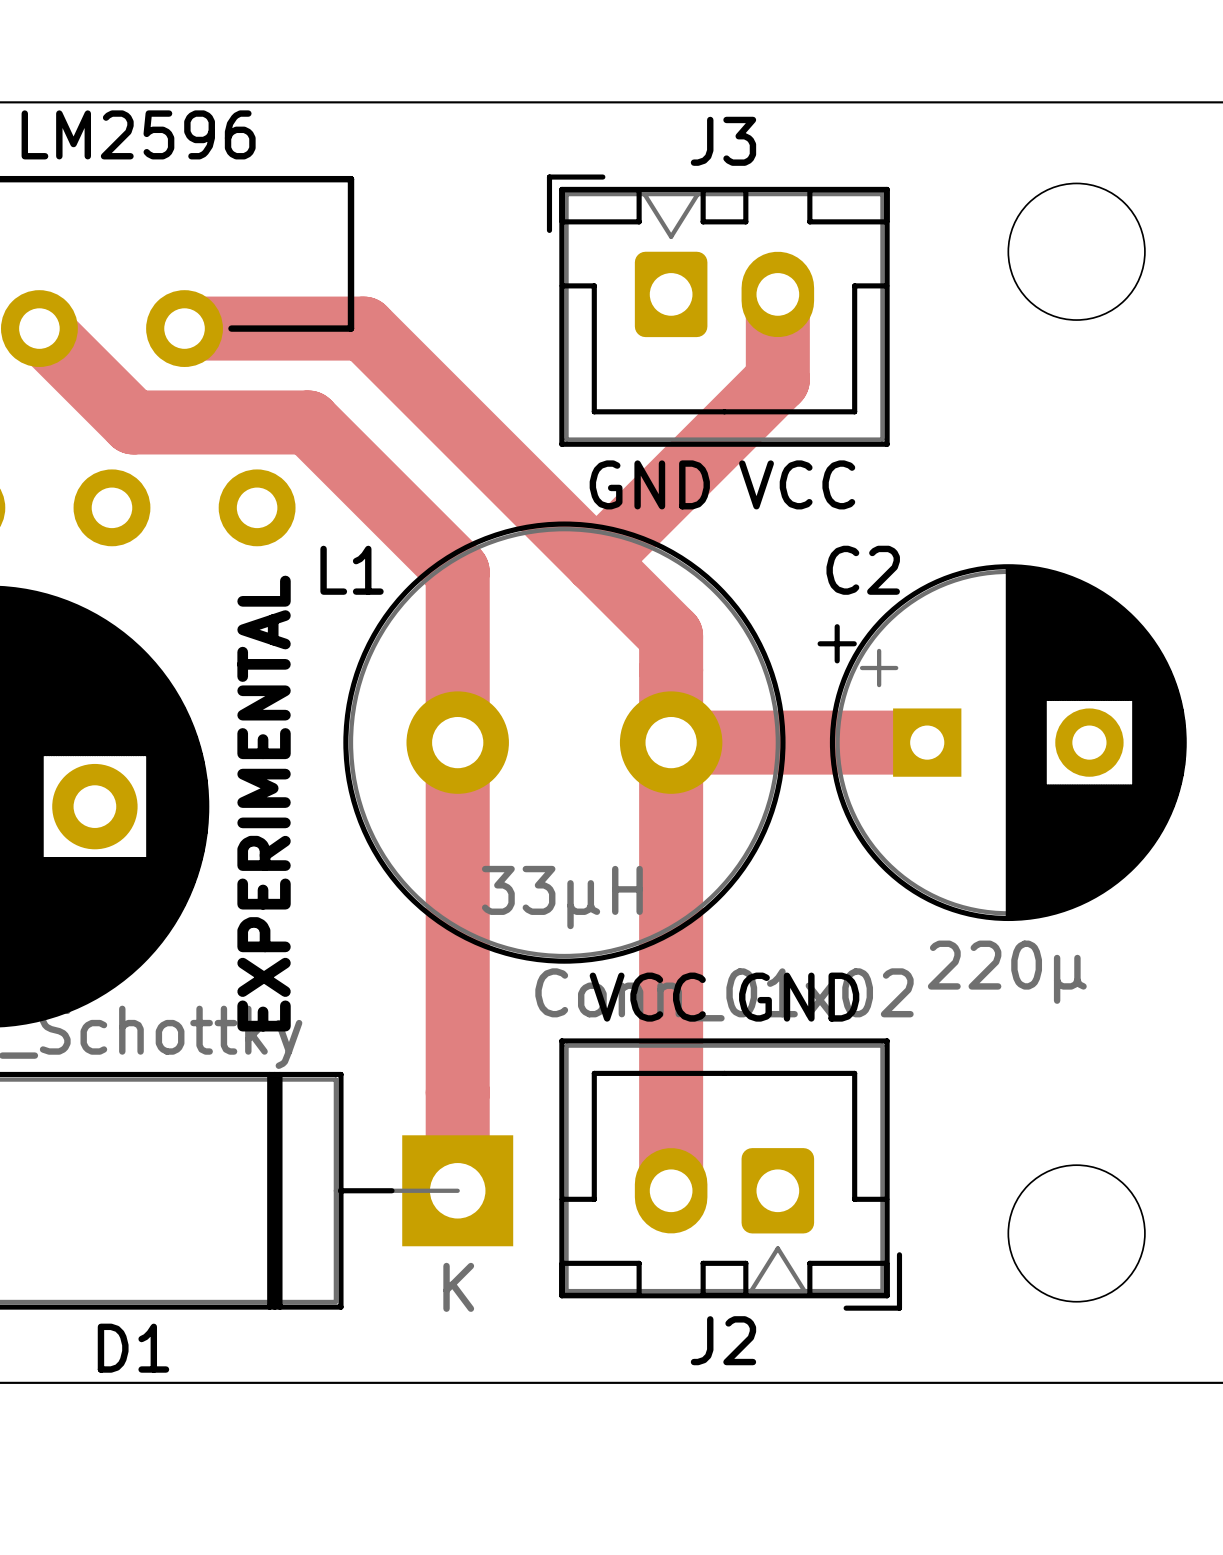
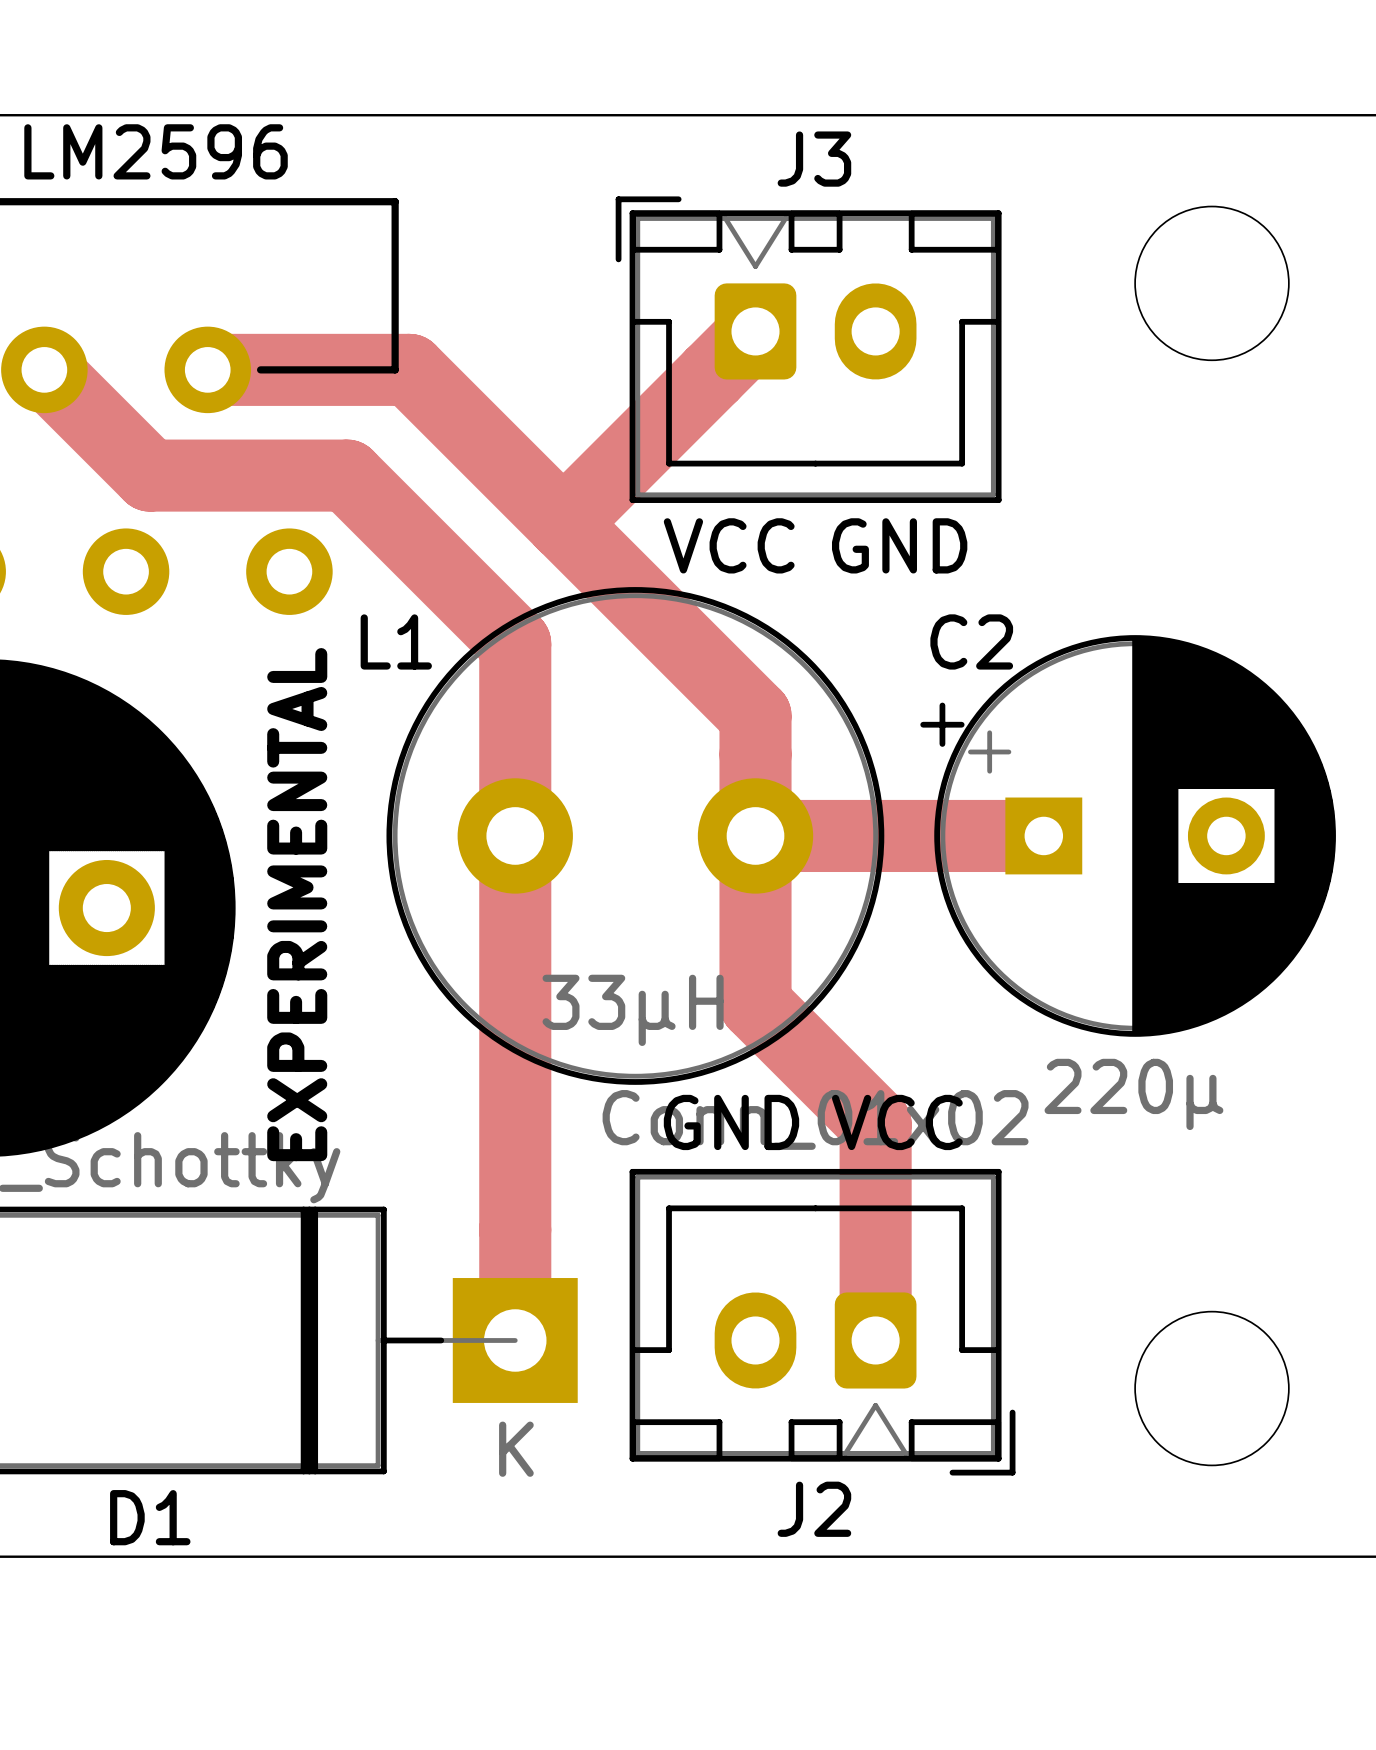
top track: none -> (755, 331) (563, 523)
top track: (777, 294) (777, 379) (596, 561) -> none
text: GND (649, 484) -> VCC (729, 545)
text: VCC (797, 484) -> GND (899, 545)
top track: (671, 891) (671, 1190) -> (755, 1004) (875, 1124) (875, 1340)
text: VCC (647, 997) -> GND (731, 1122)
text: GND (799, 997) -> VCC (897, 1122)

